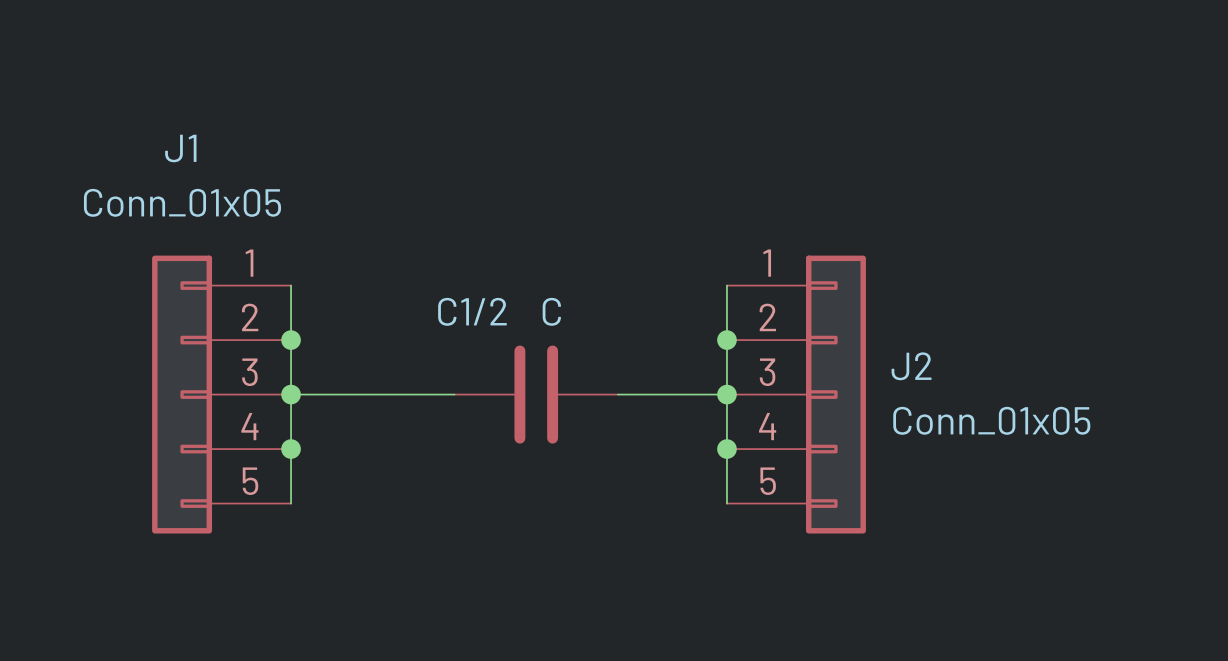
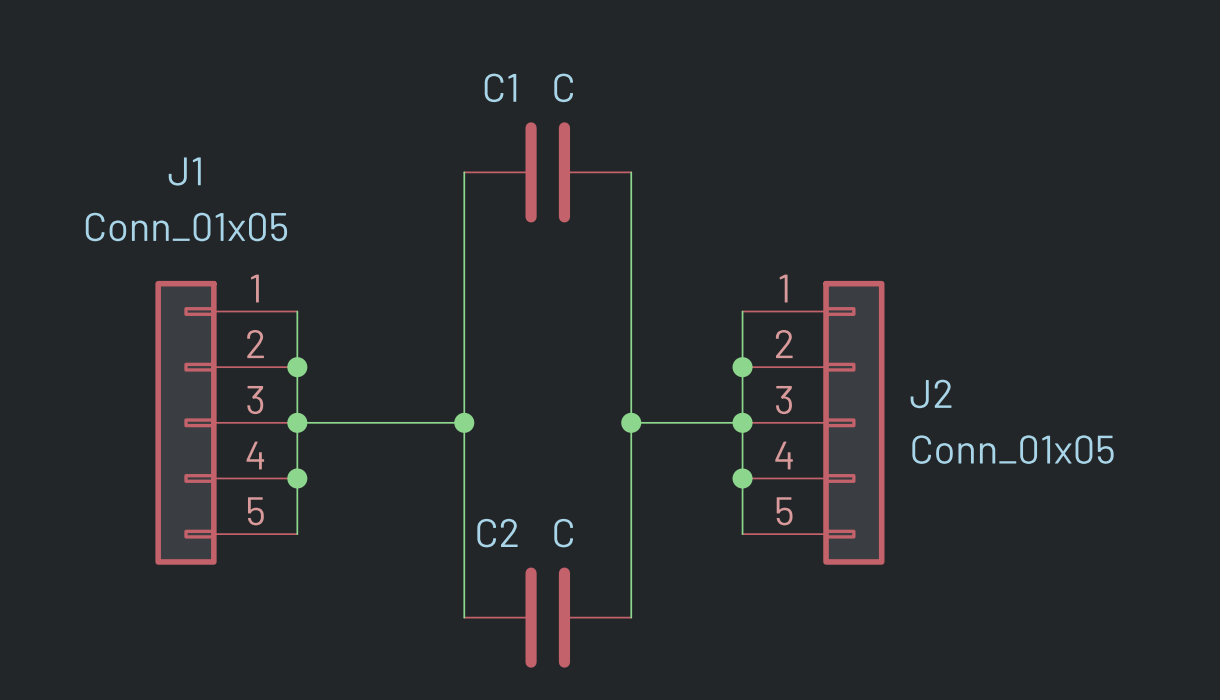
wire: none -> (464, 172) (464, 617)
C1: none -> C (547, 172)
wire: none -> (631, 172) (631, 617)
junction: none -> (464, 422)
C1/2: C (536, 394) -> none
junction: none -> (631, 422)
C2: none -> C (547, 617)

